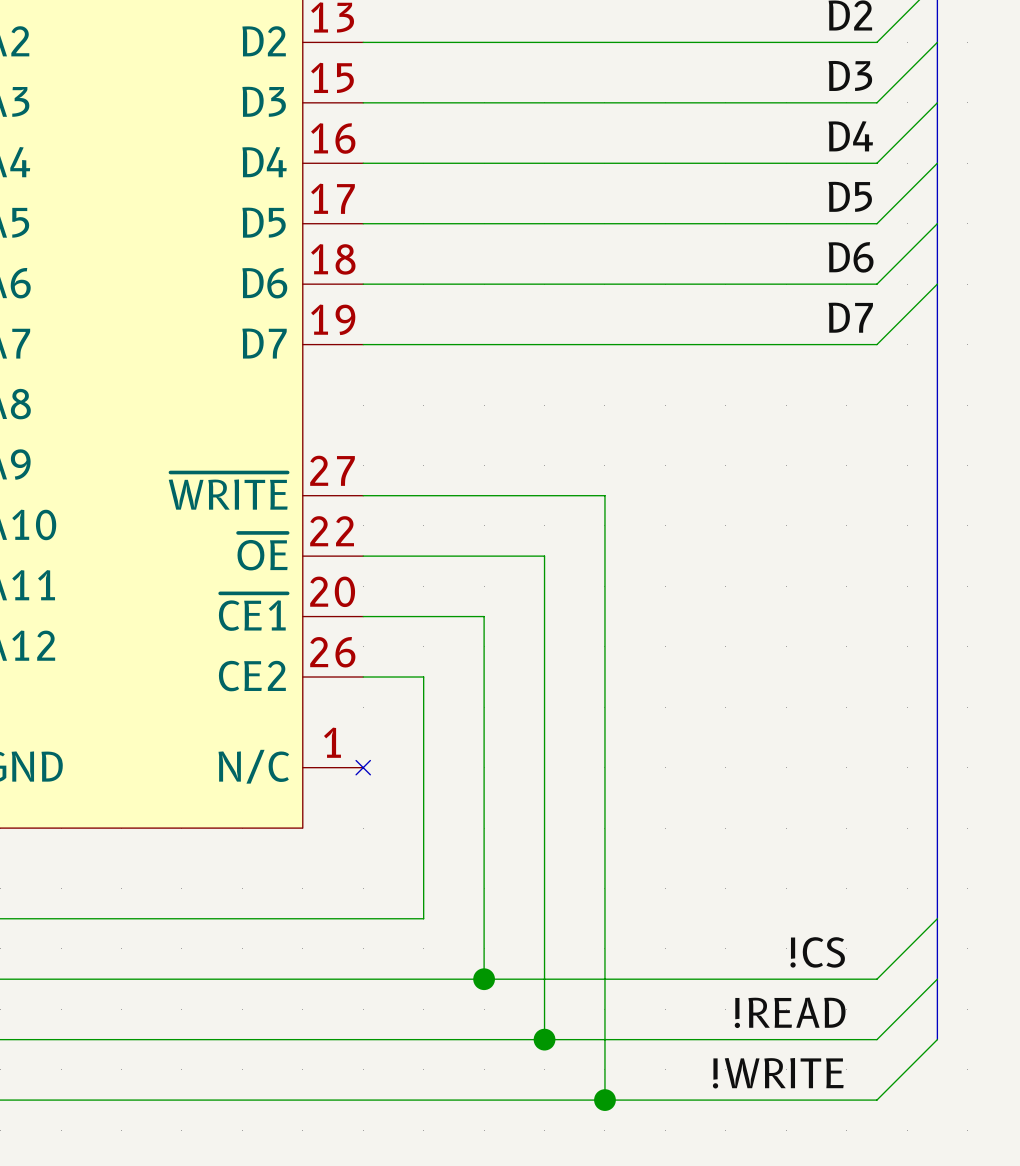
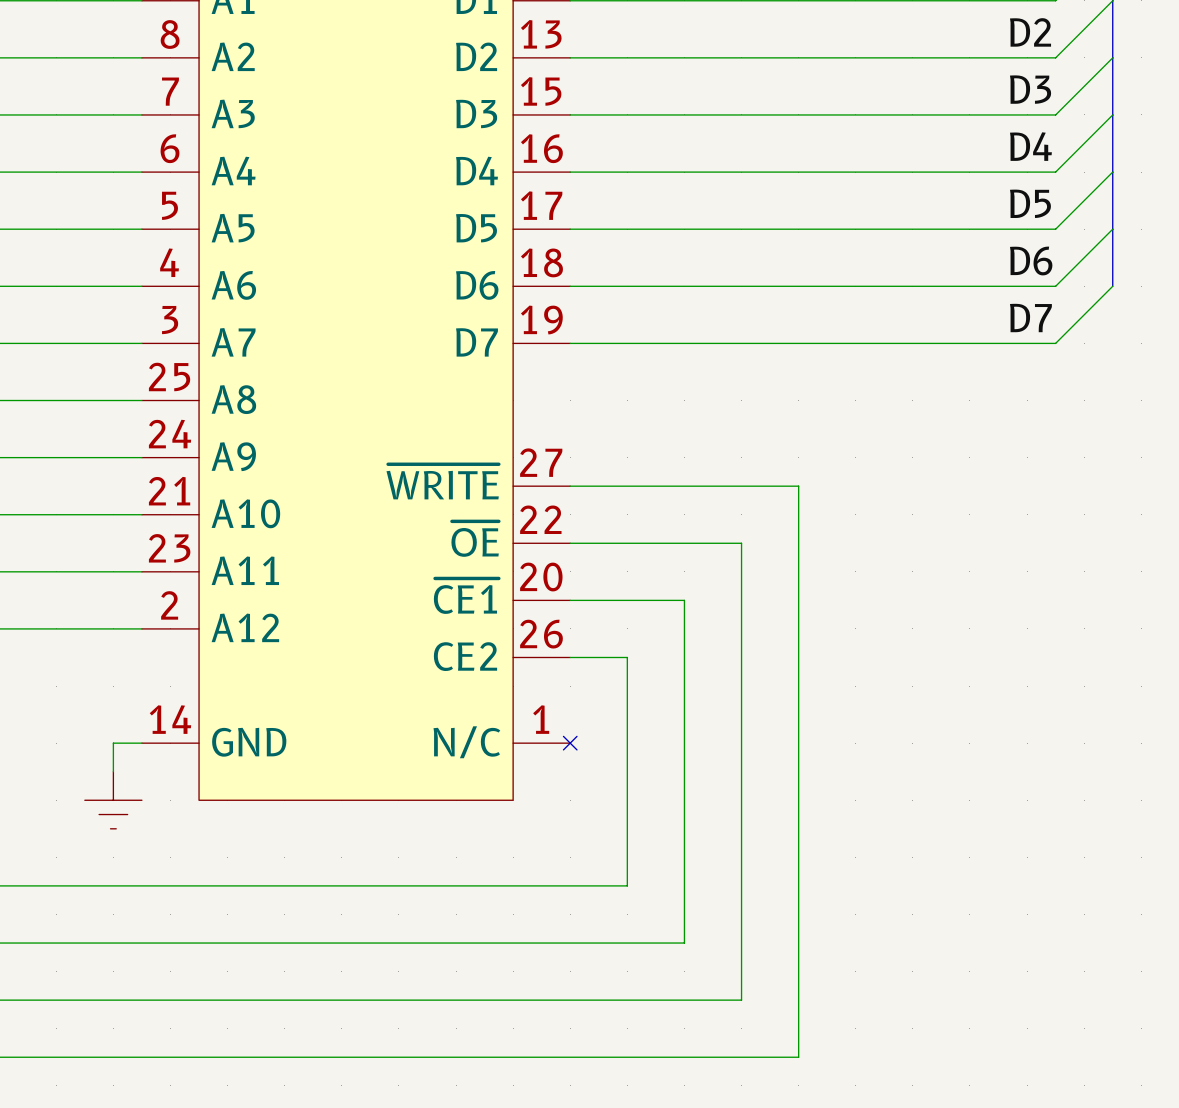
bus: (937, 284) (937, 1039) -> none
wire: (937, 918) (876, 979) (484, 979) -> none
label: !CS (817, 952) -> none
junction: (484, 979) -> none
wire: (937, 979) (876, 1039) (544, 1039) -> none
label: !READ (790, 1012) -> none
junction: (544, 1039) -> none
wire: (937, 1039) (876, 1100) (604, 1100) -> none
label: !WRITE (778, 1073) -> none
junction: (604, 1100) -> none

